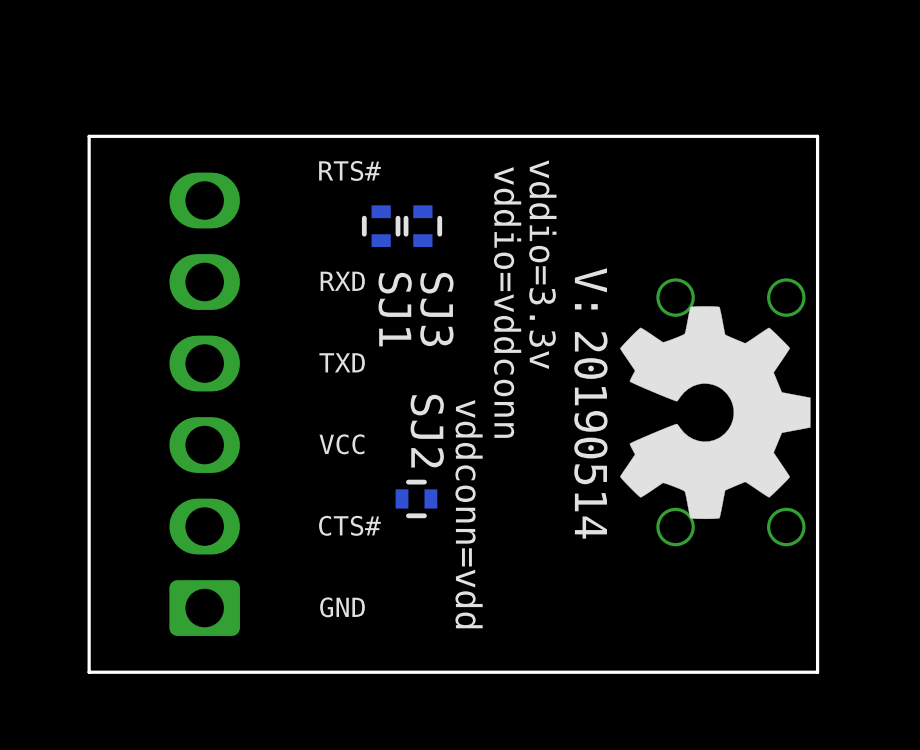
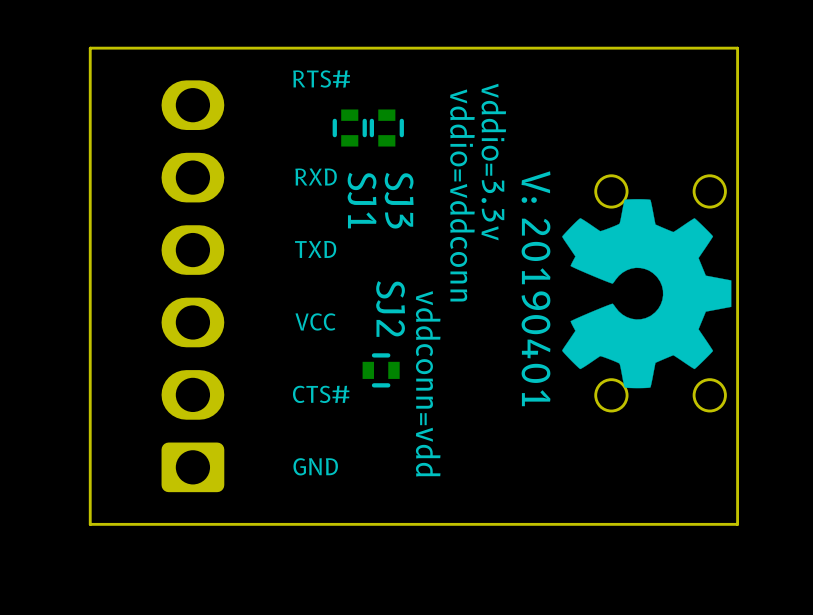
drawing shape: [574, 268, 608, 539] -> [521, 171, 551, 407]

